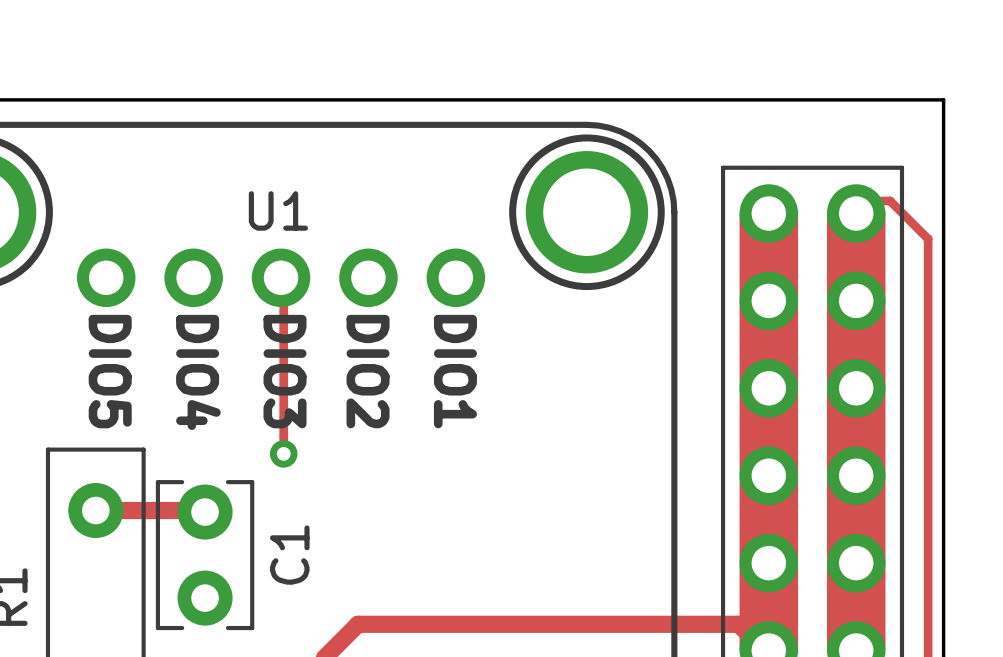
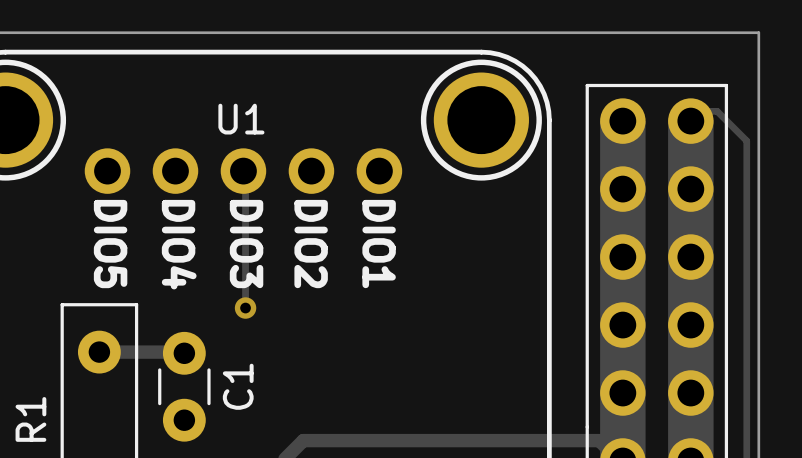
C1 footprint: [155, 480, 255, 631] -> [158, 331, 211, 442]

